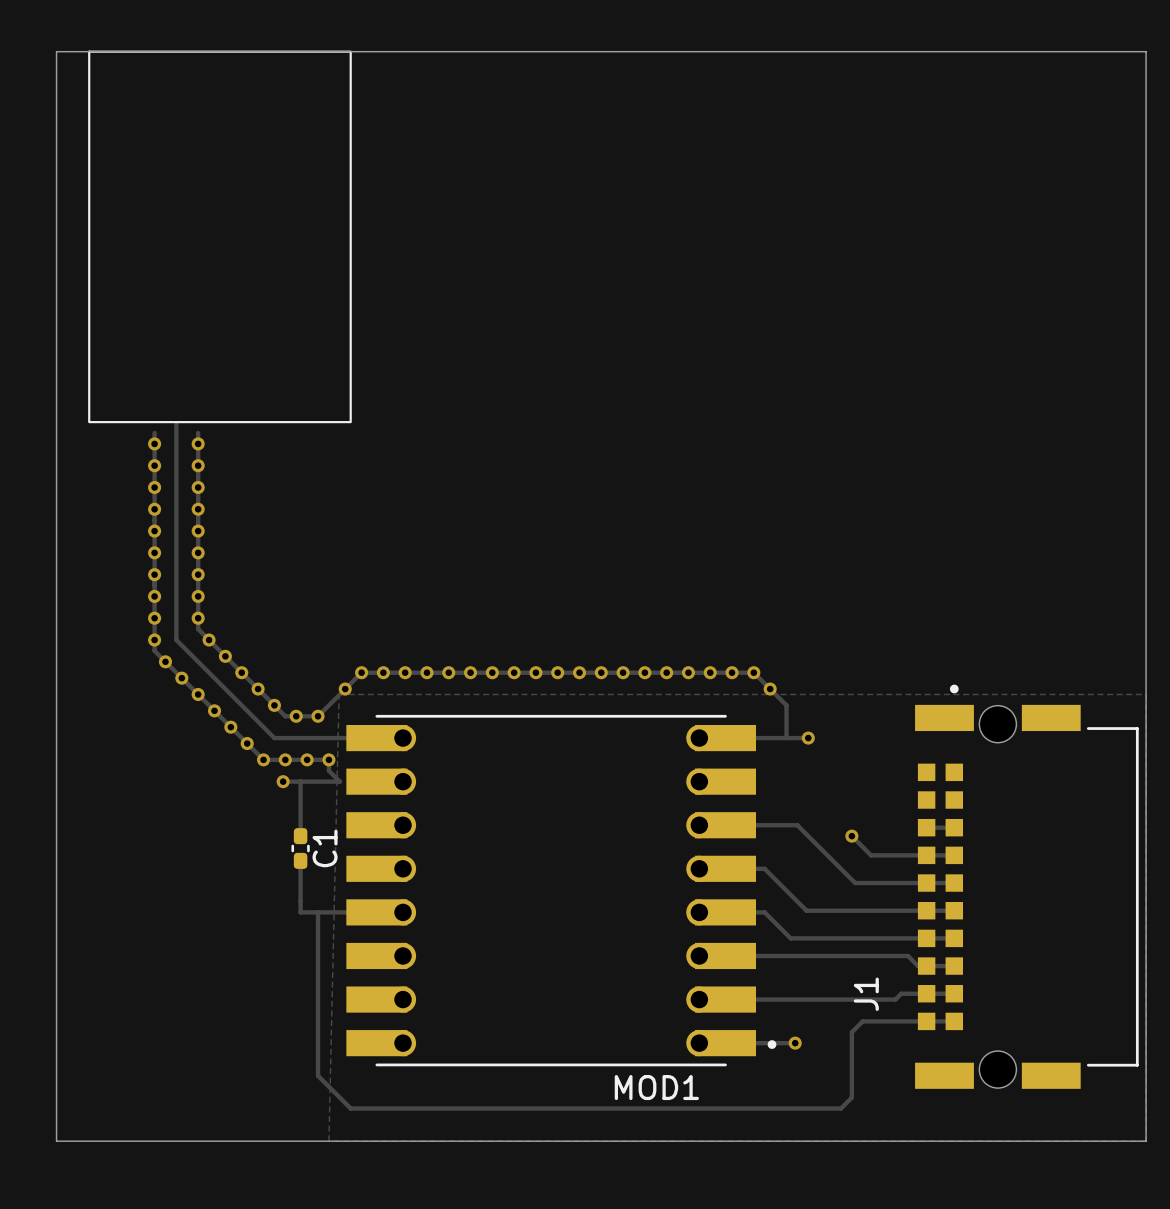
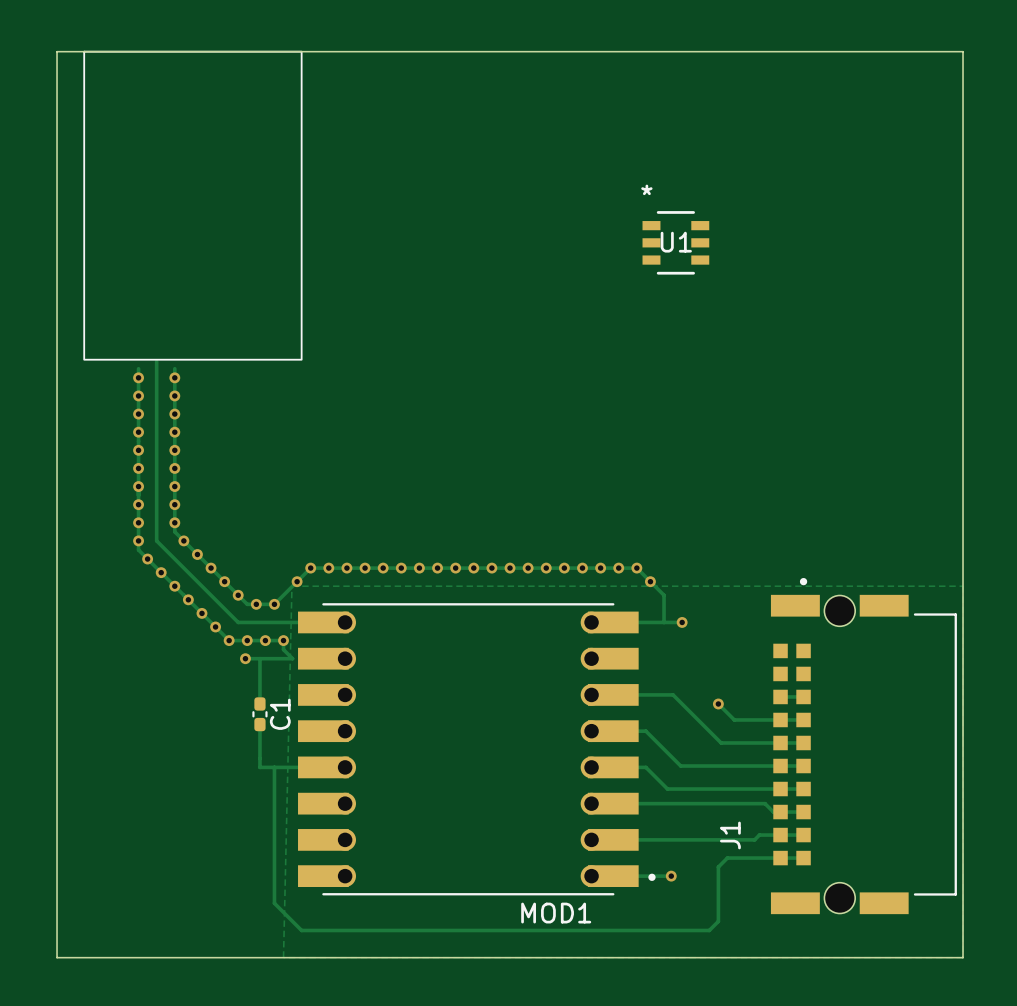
U1: none -> (675, 242)

